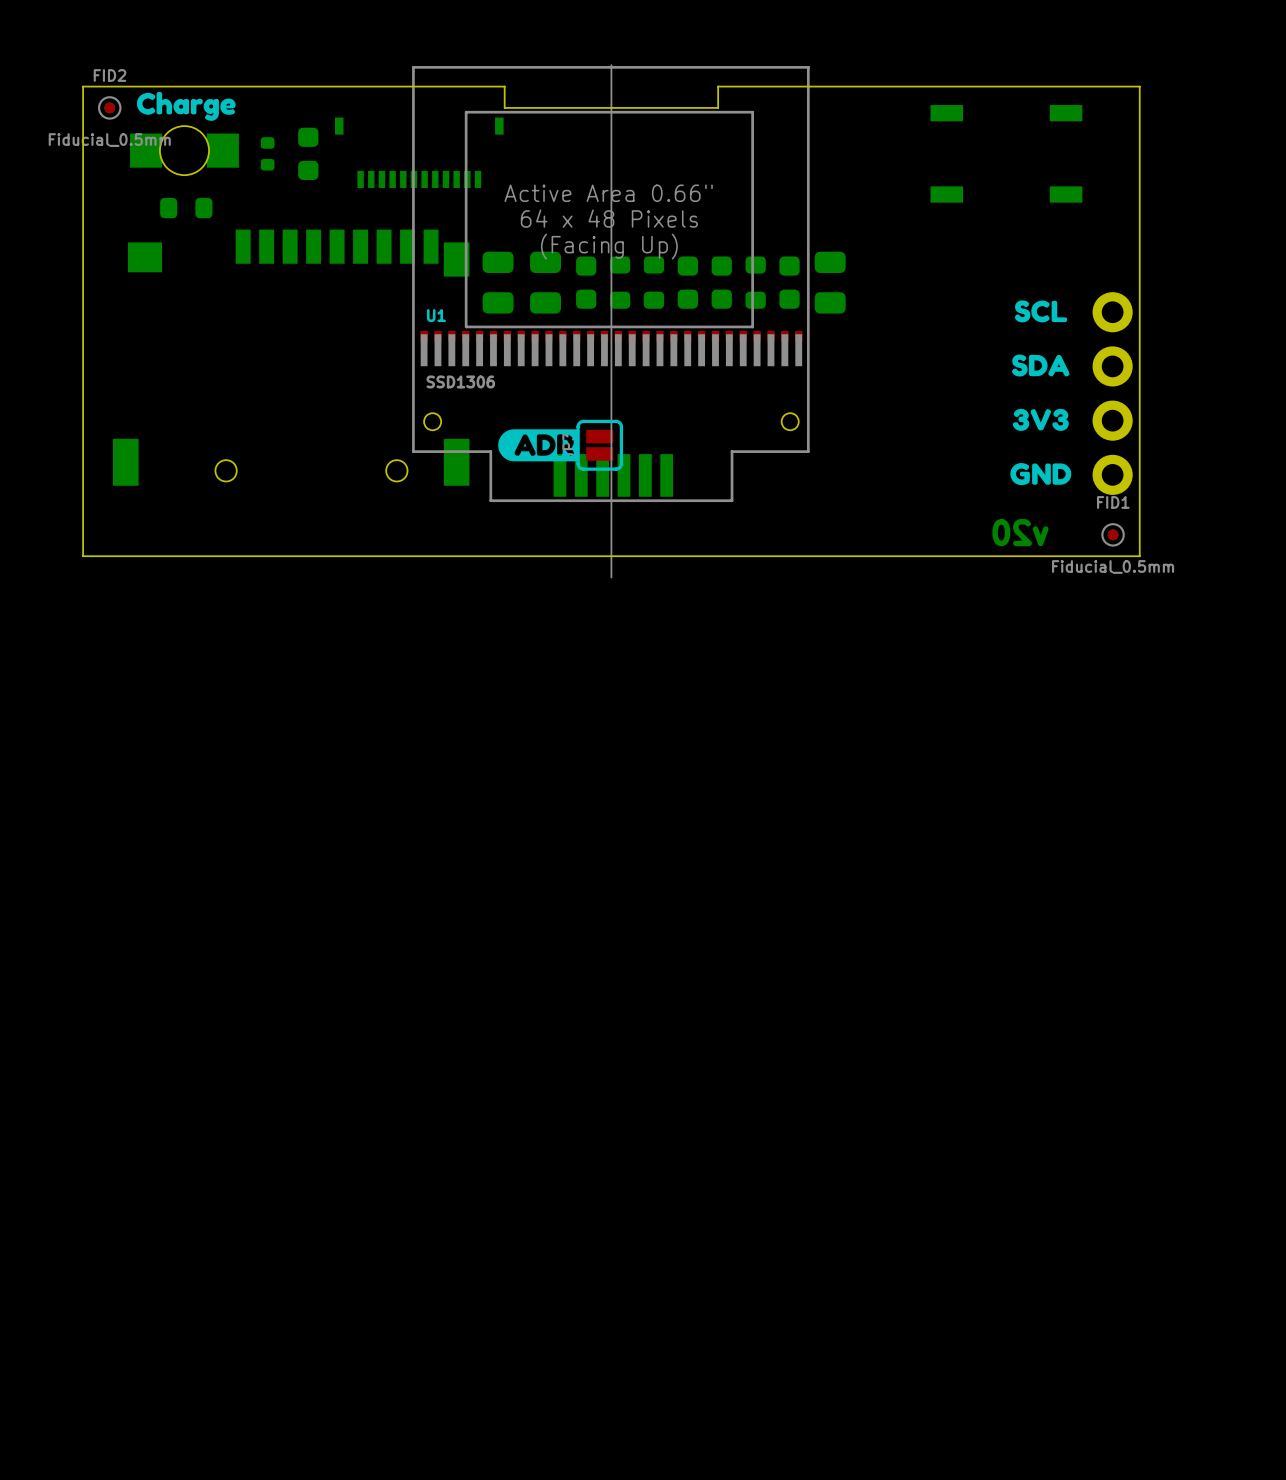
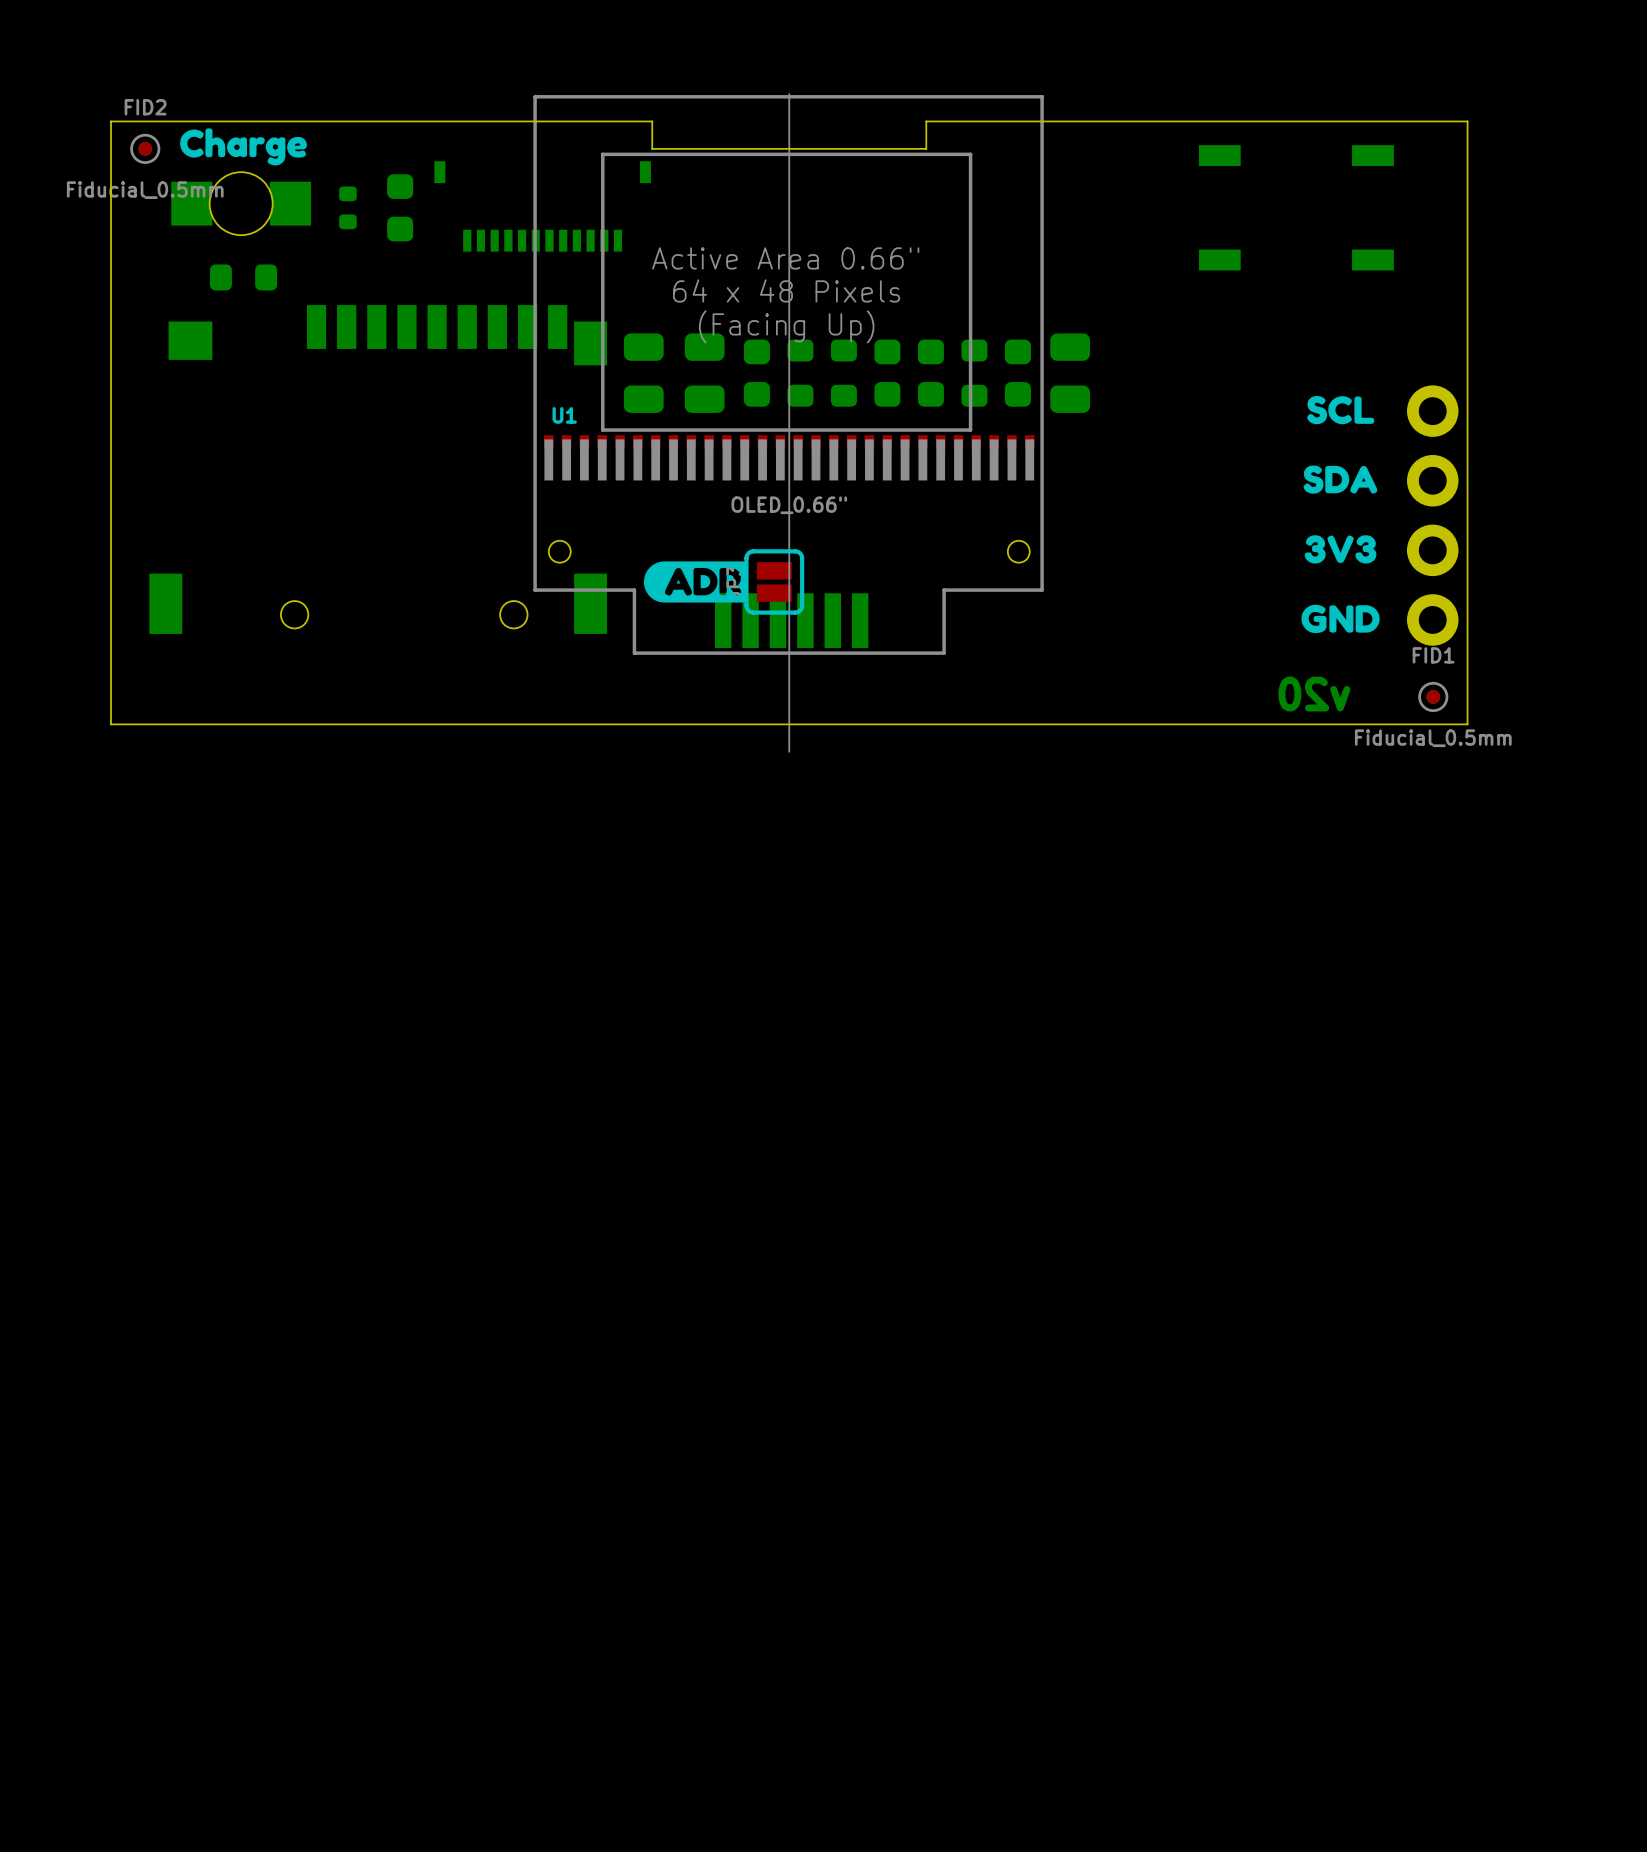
U1 value: SSD1306 (460, 381) -> OLED_0.66" (789, 505)

